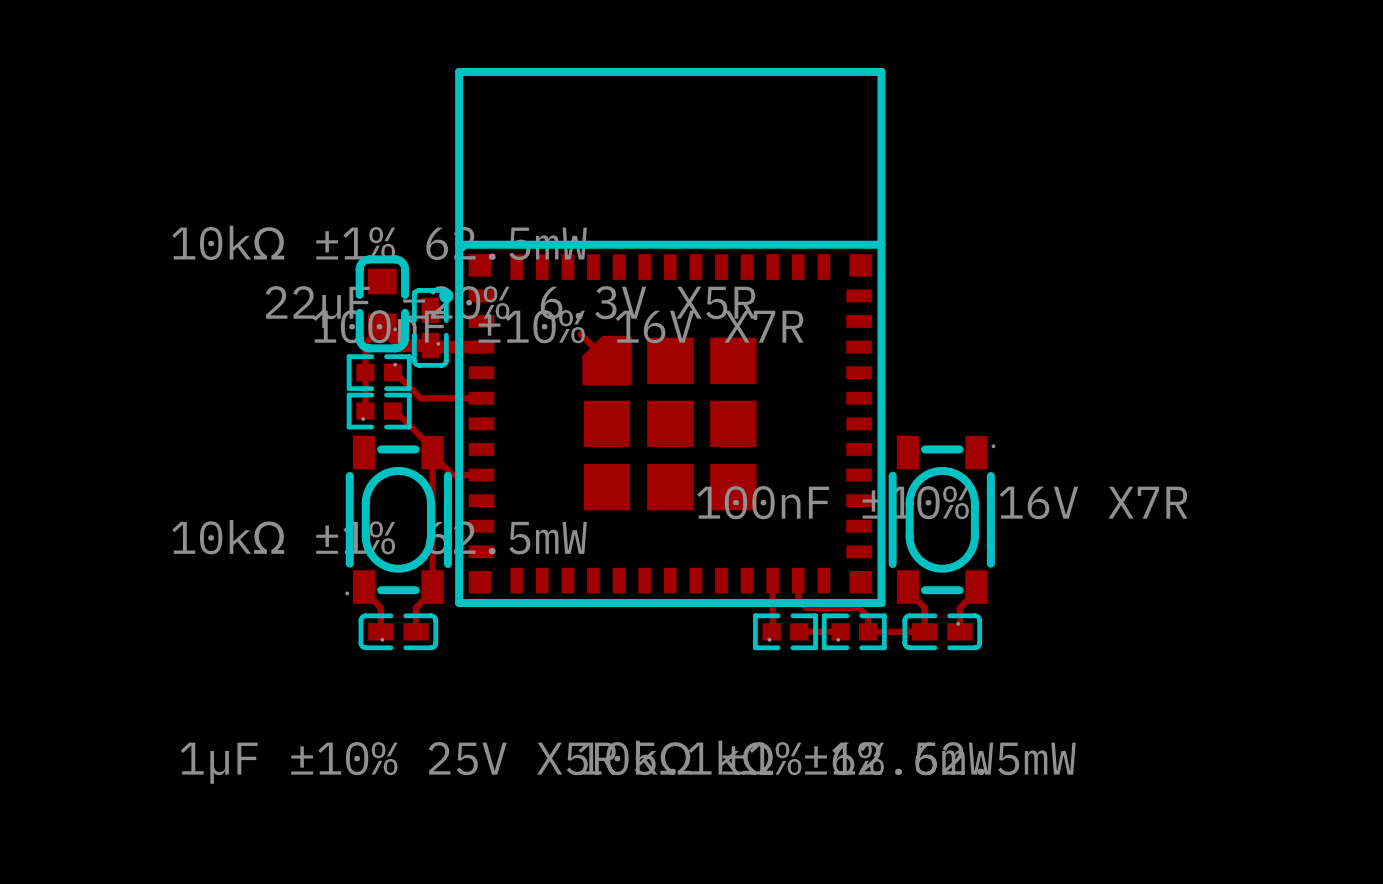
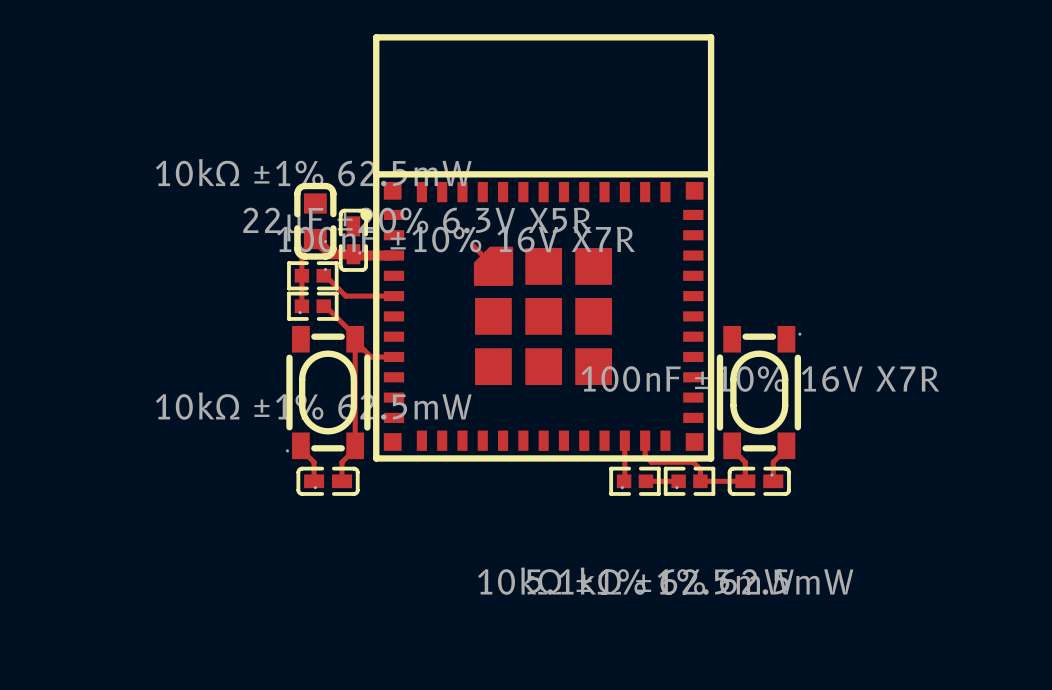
part value: 1µF ±10% 25V X5R (398, 762) -> none

